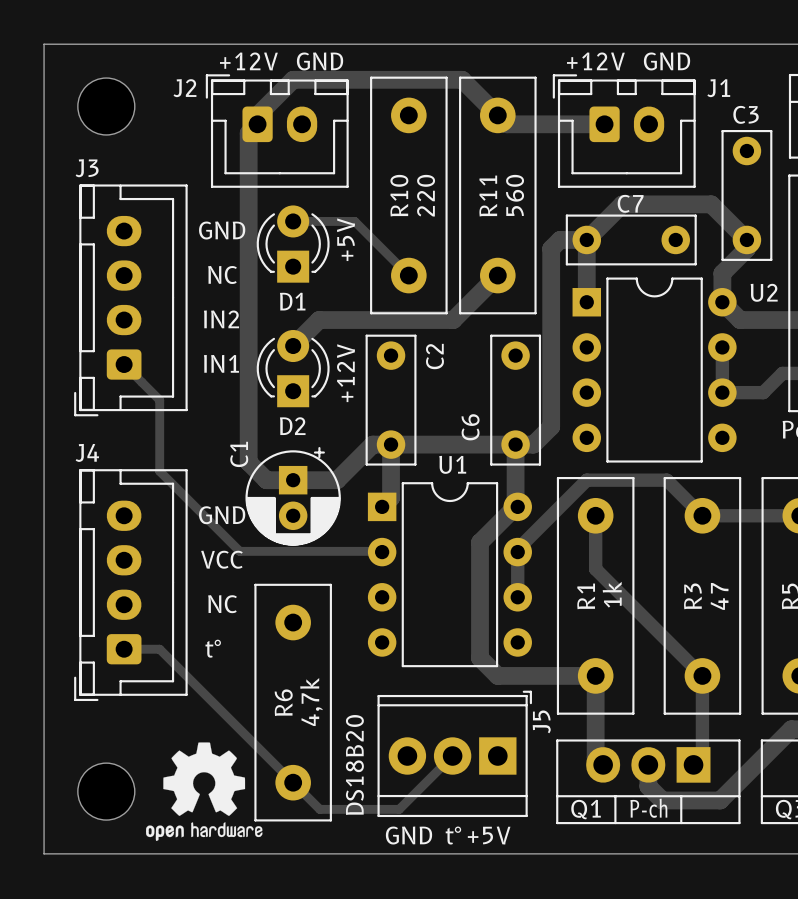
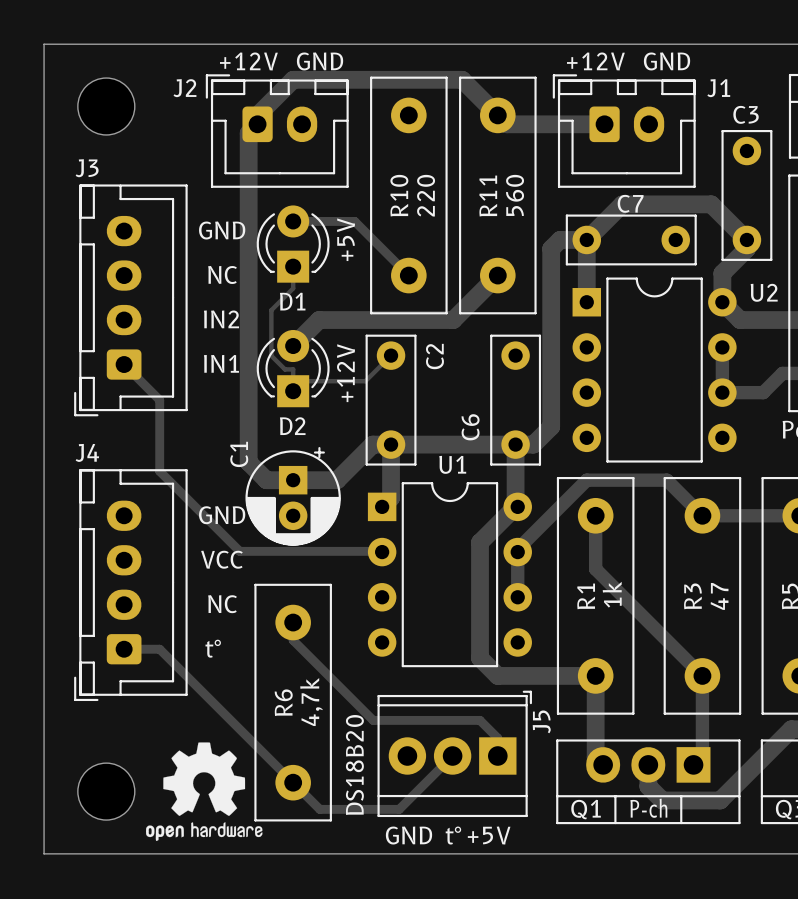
track: none -> (293, 266) (293, 288) (271, 310) (271, 355) (284, 369) (293, 369) (293, 391)
track: none -> (391, 355) (365, 381) (293, 381)
track: none -> (293, 622) (293, 640) (373, 720) (480, 720) (497, 738) (497, 756)

